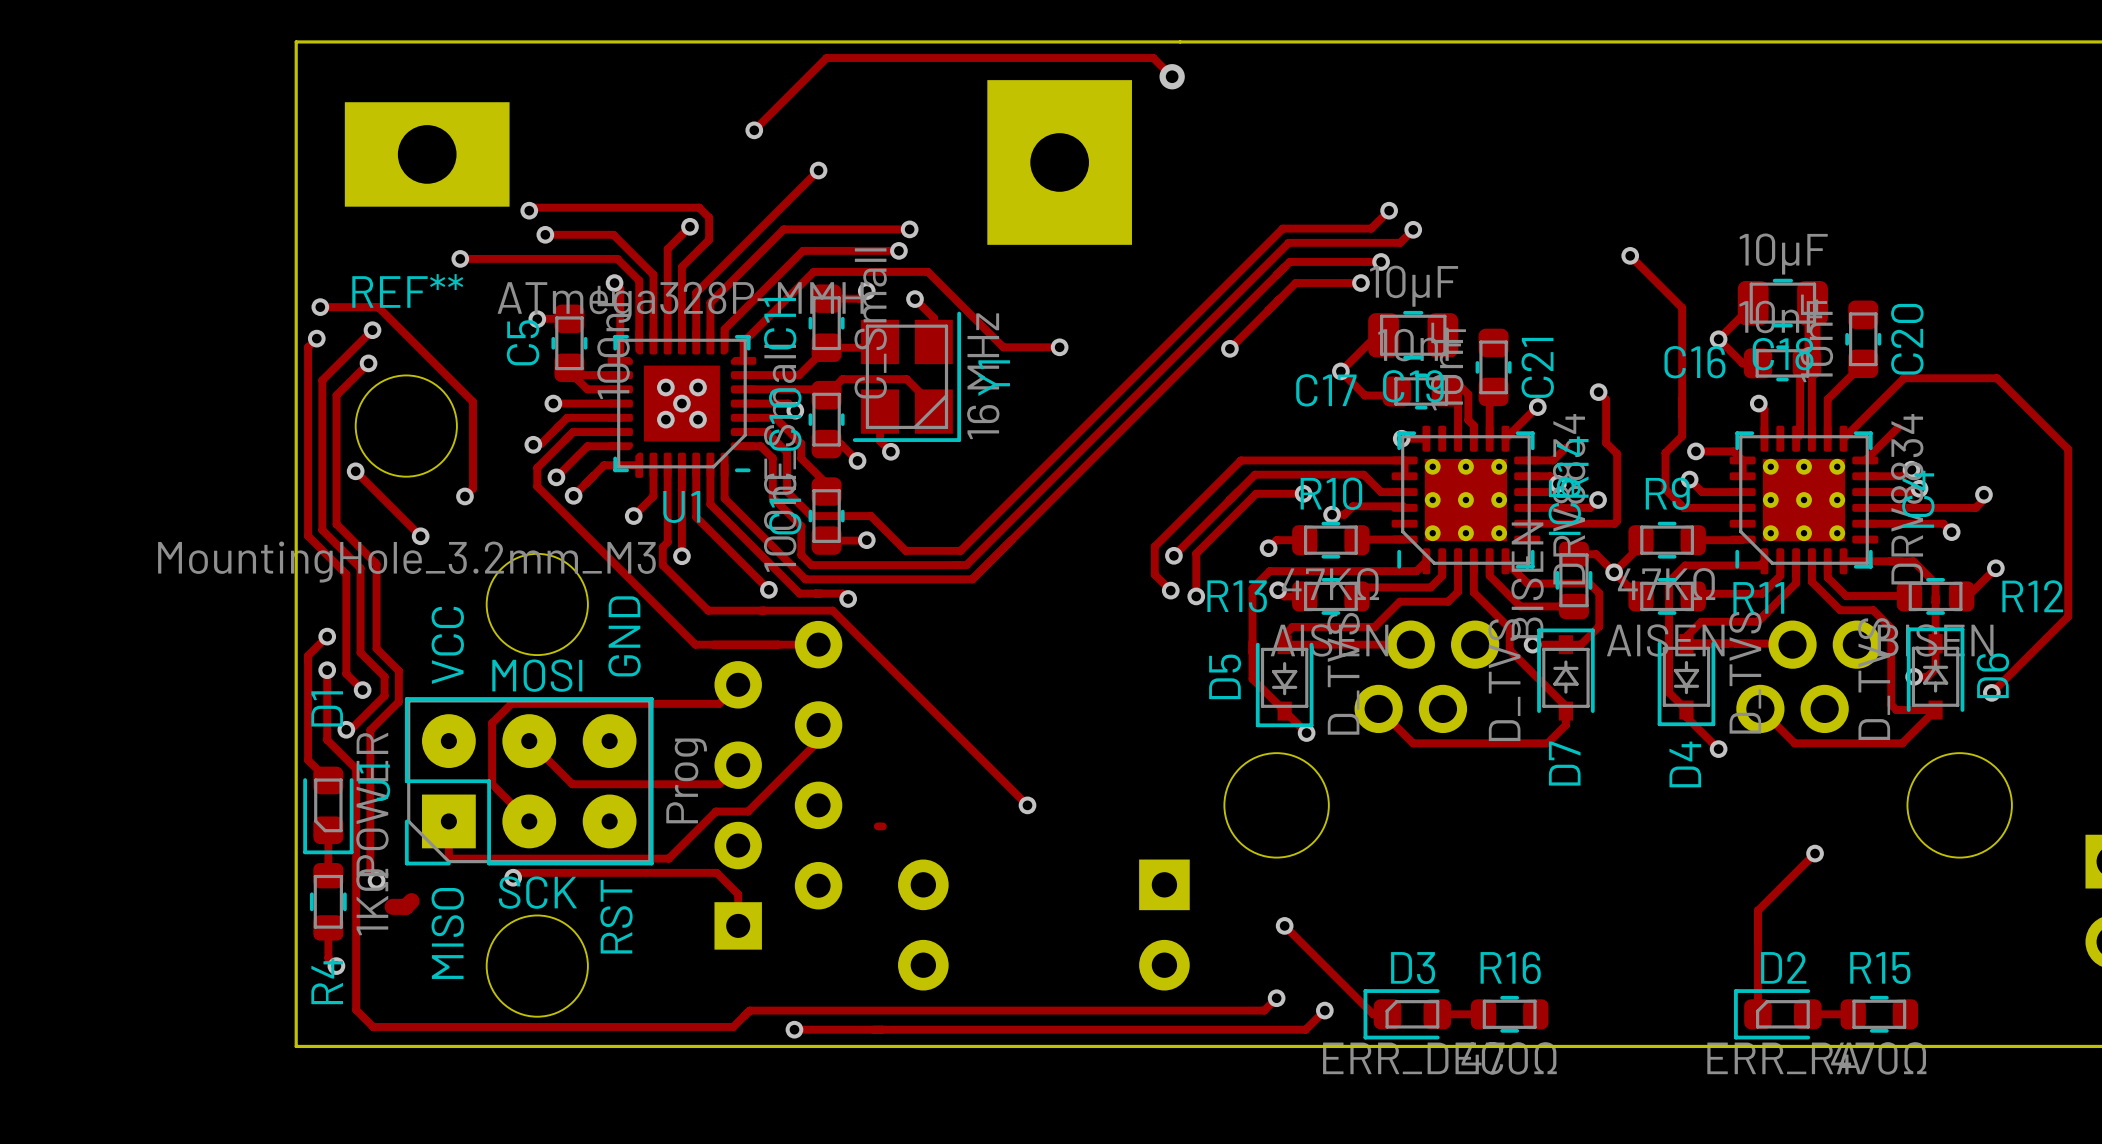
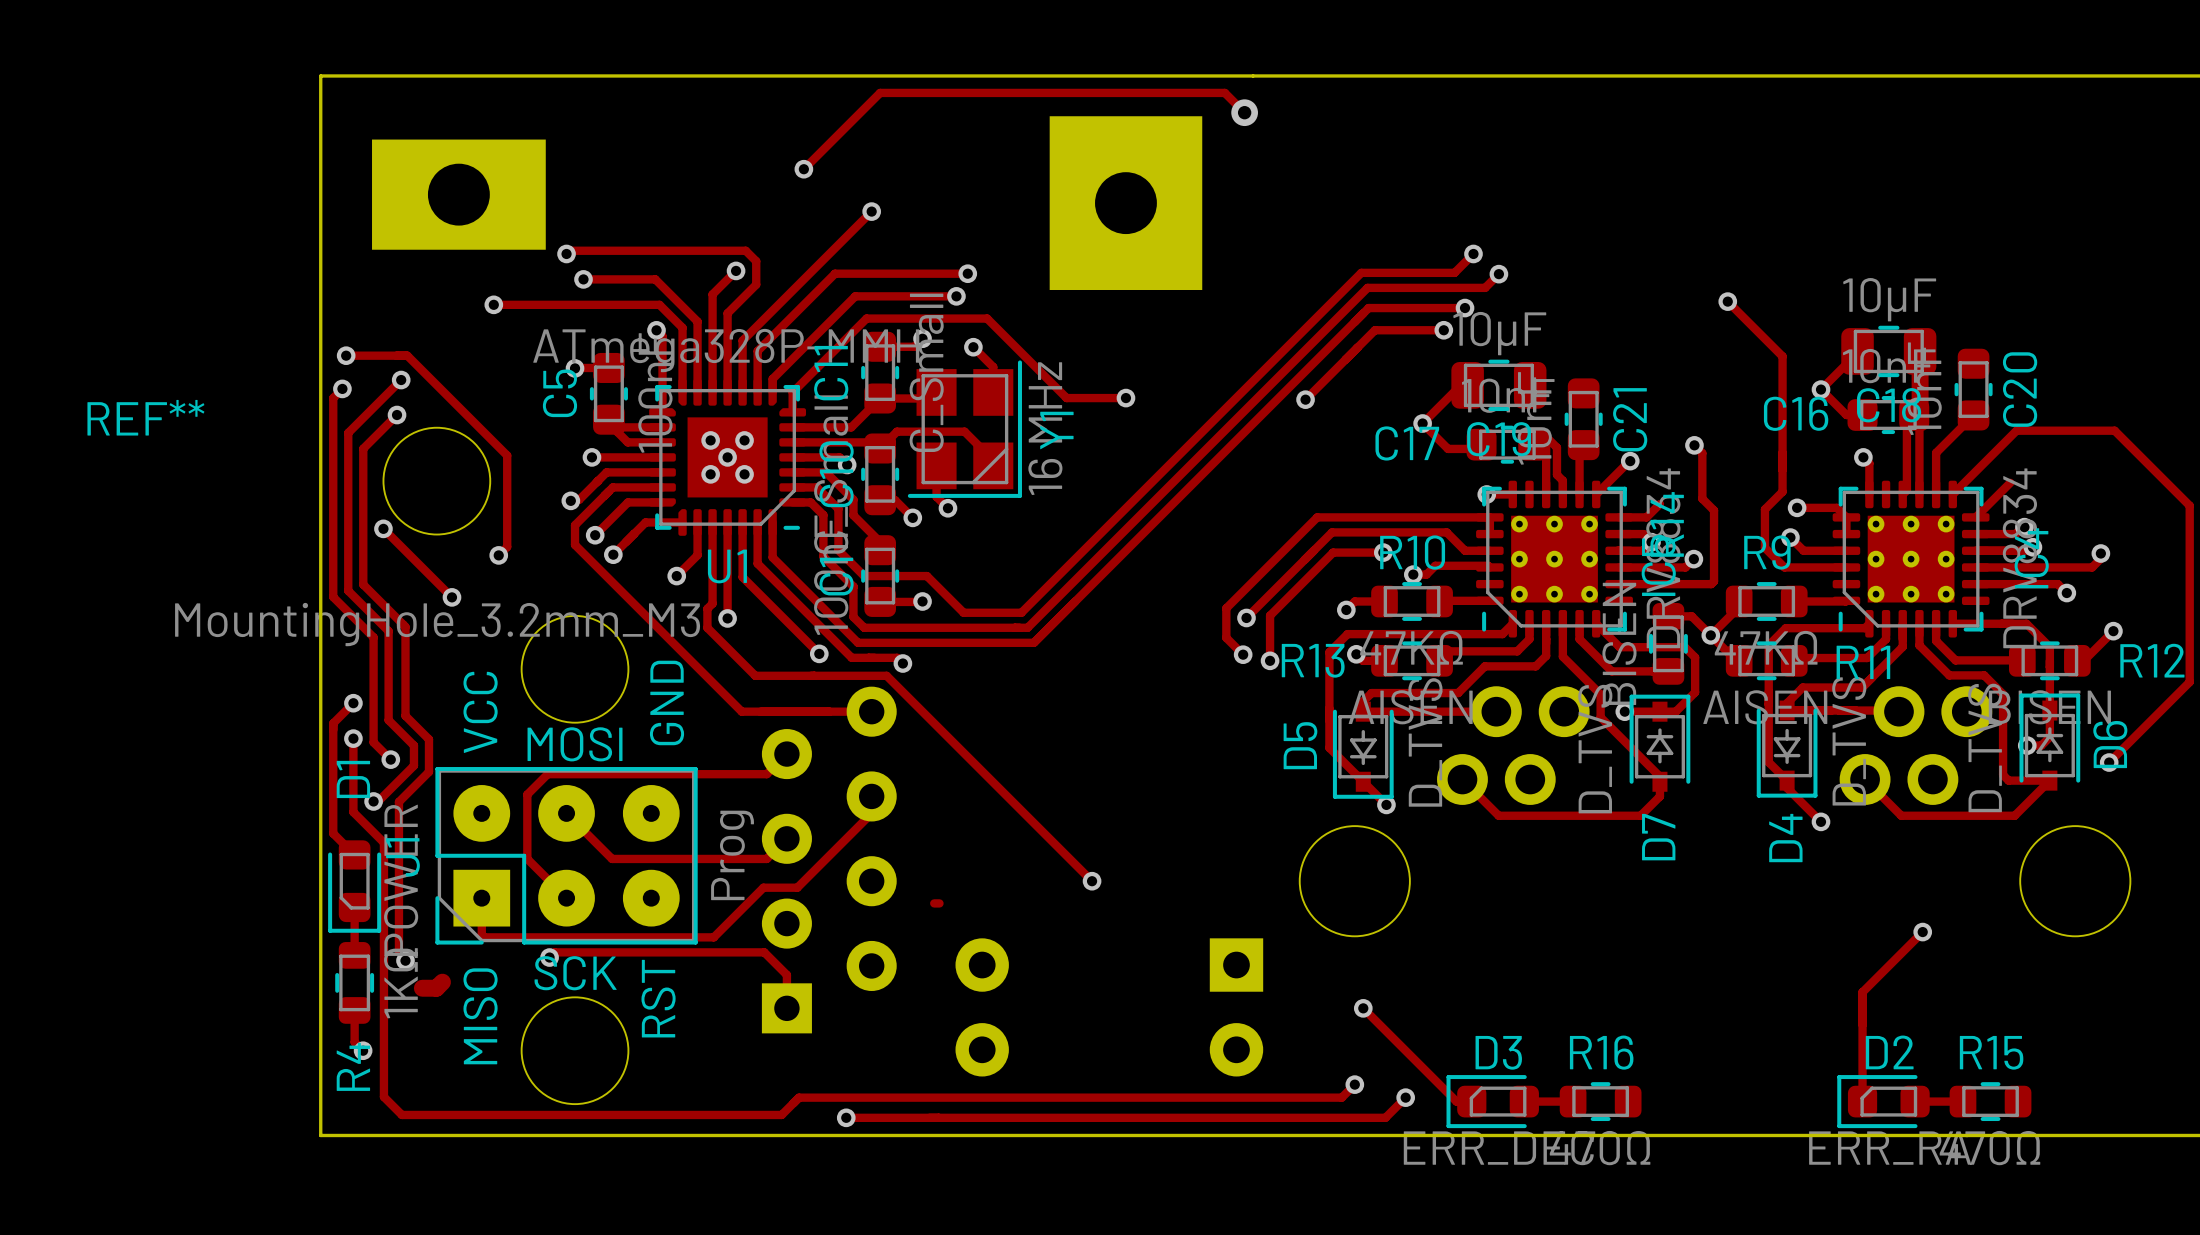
REF** name position: REF** (407, 290) -> REF** (145, 417)

